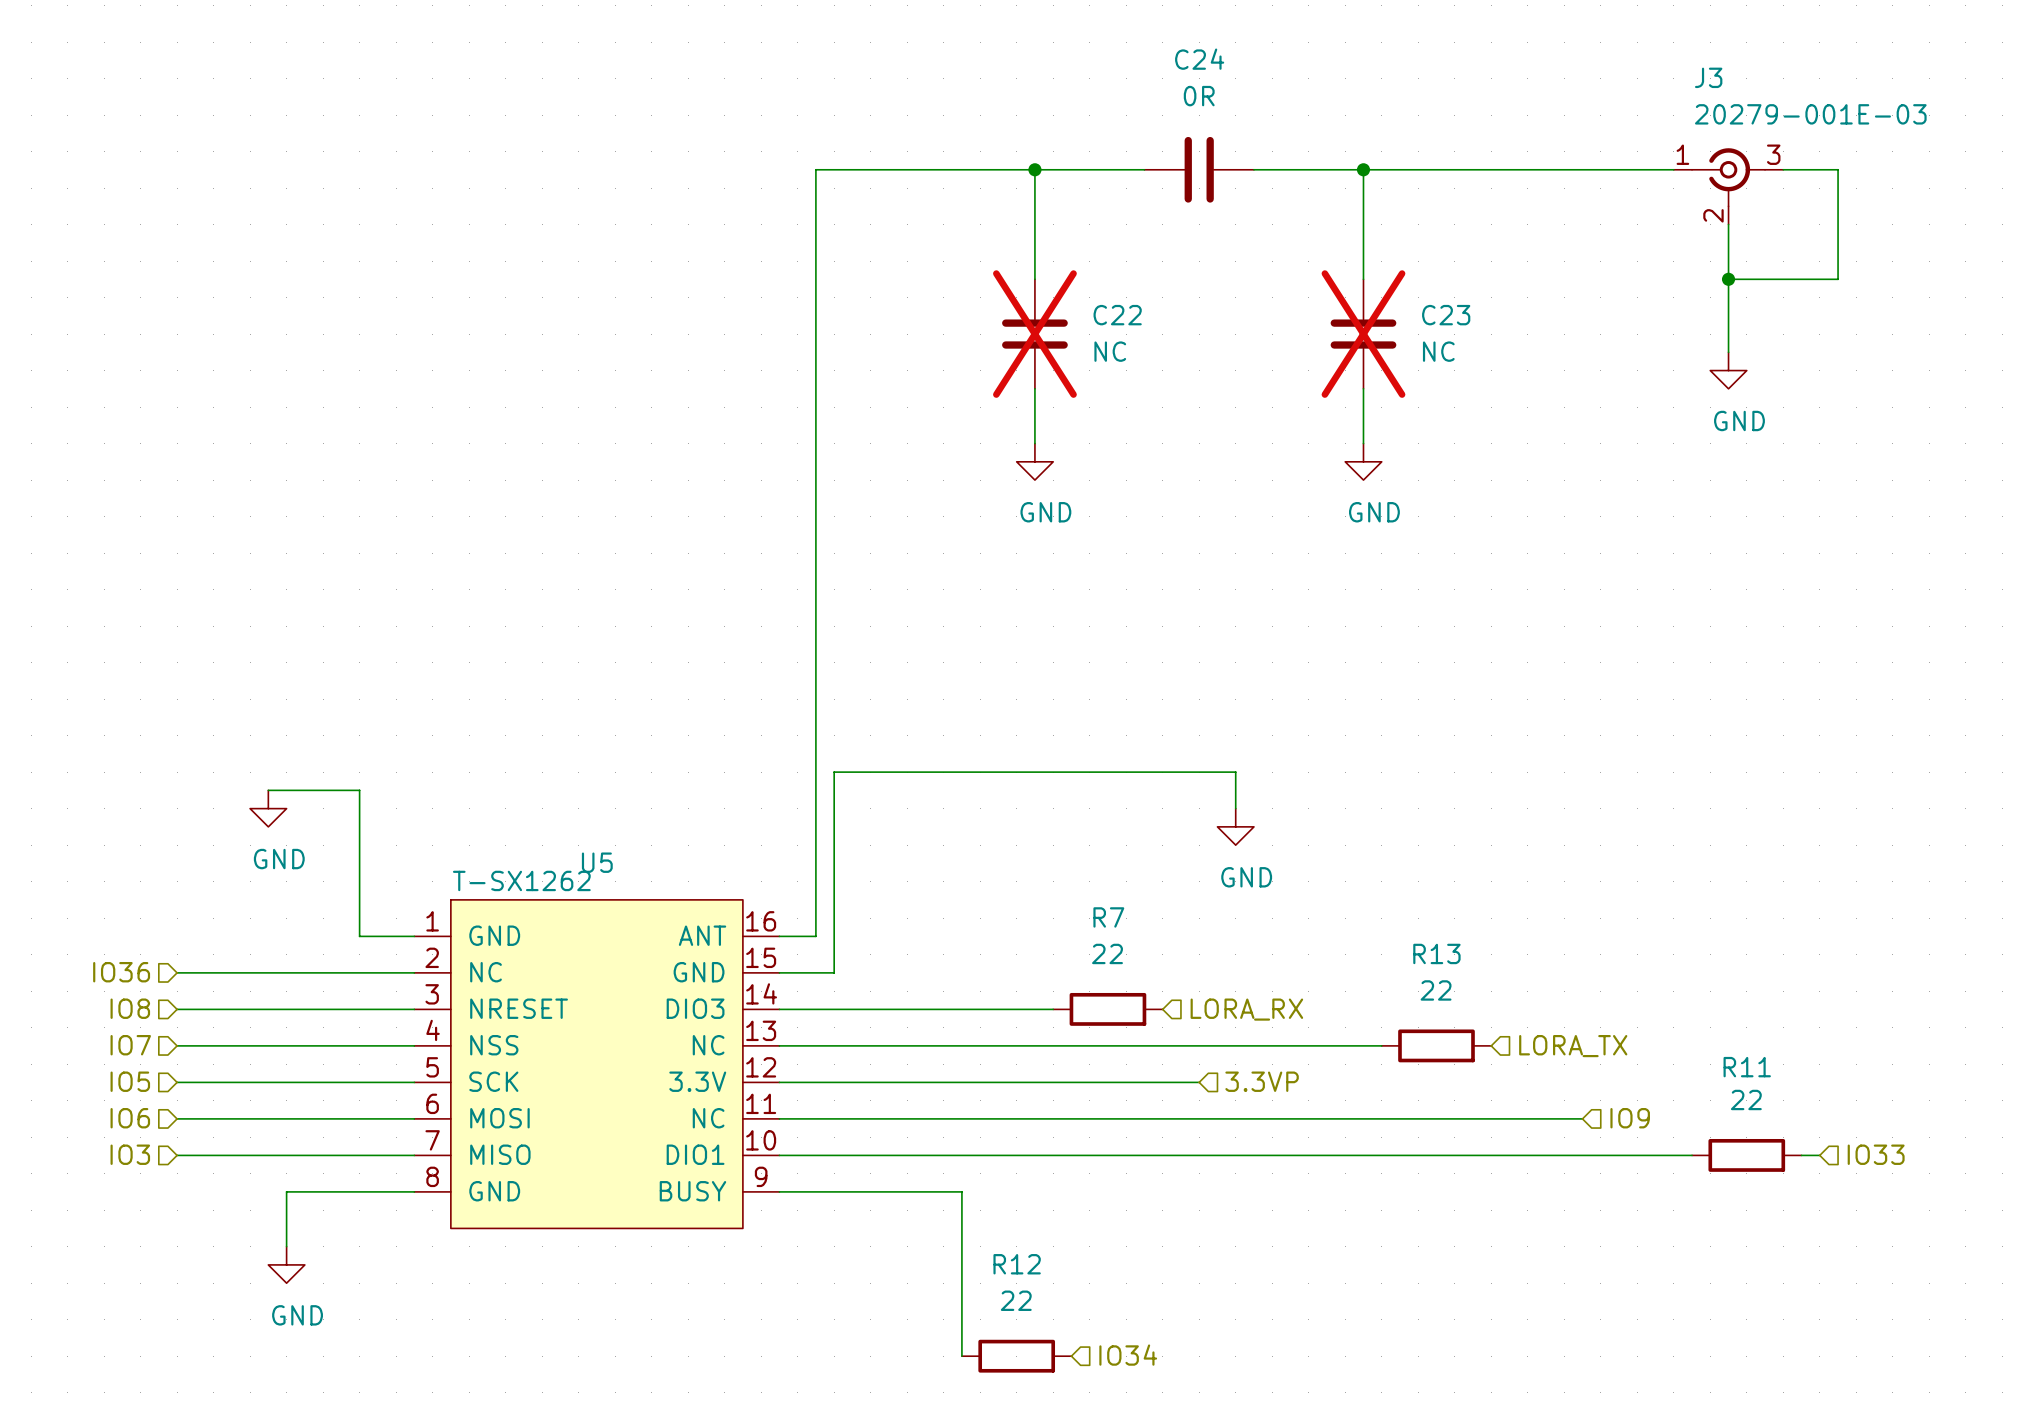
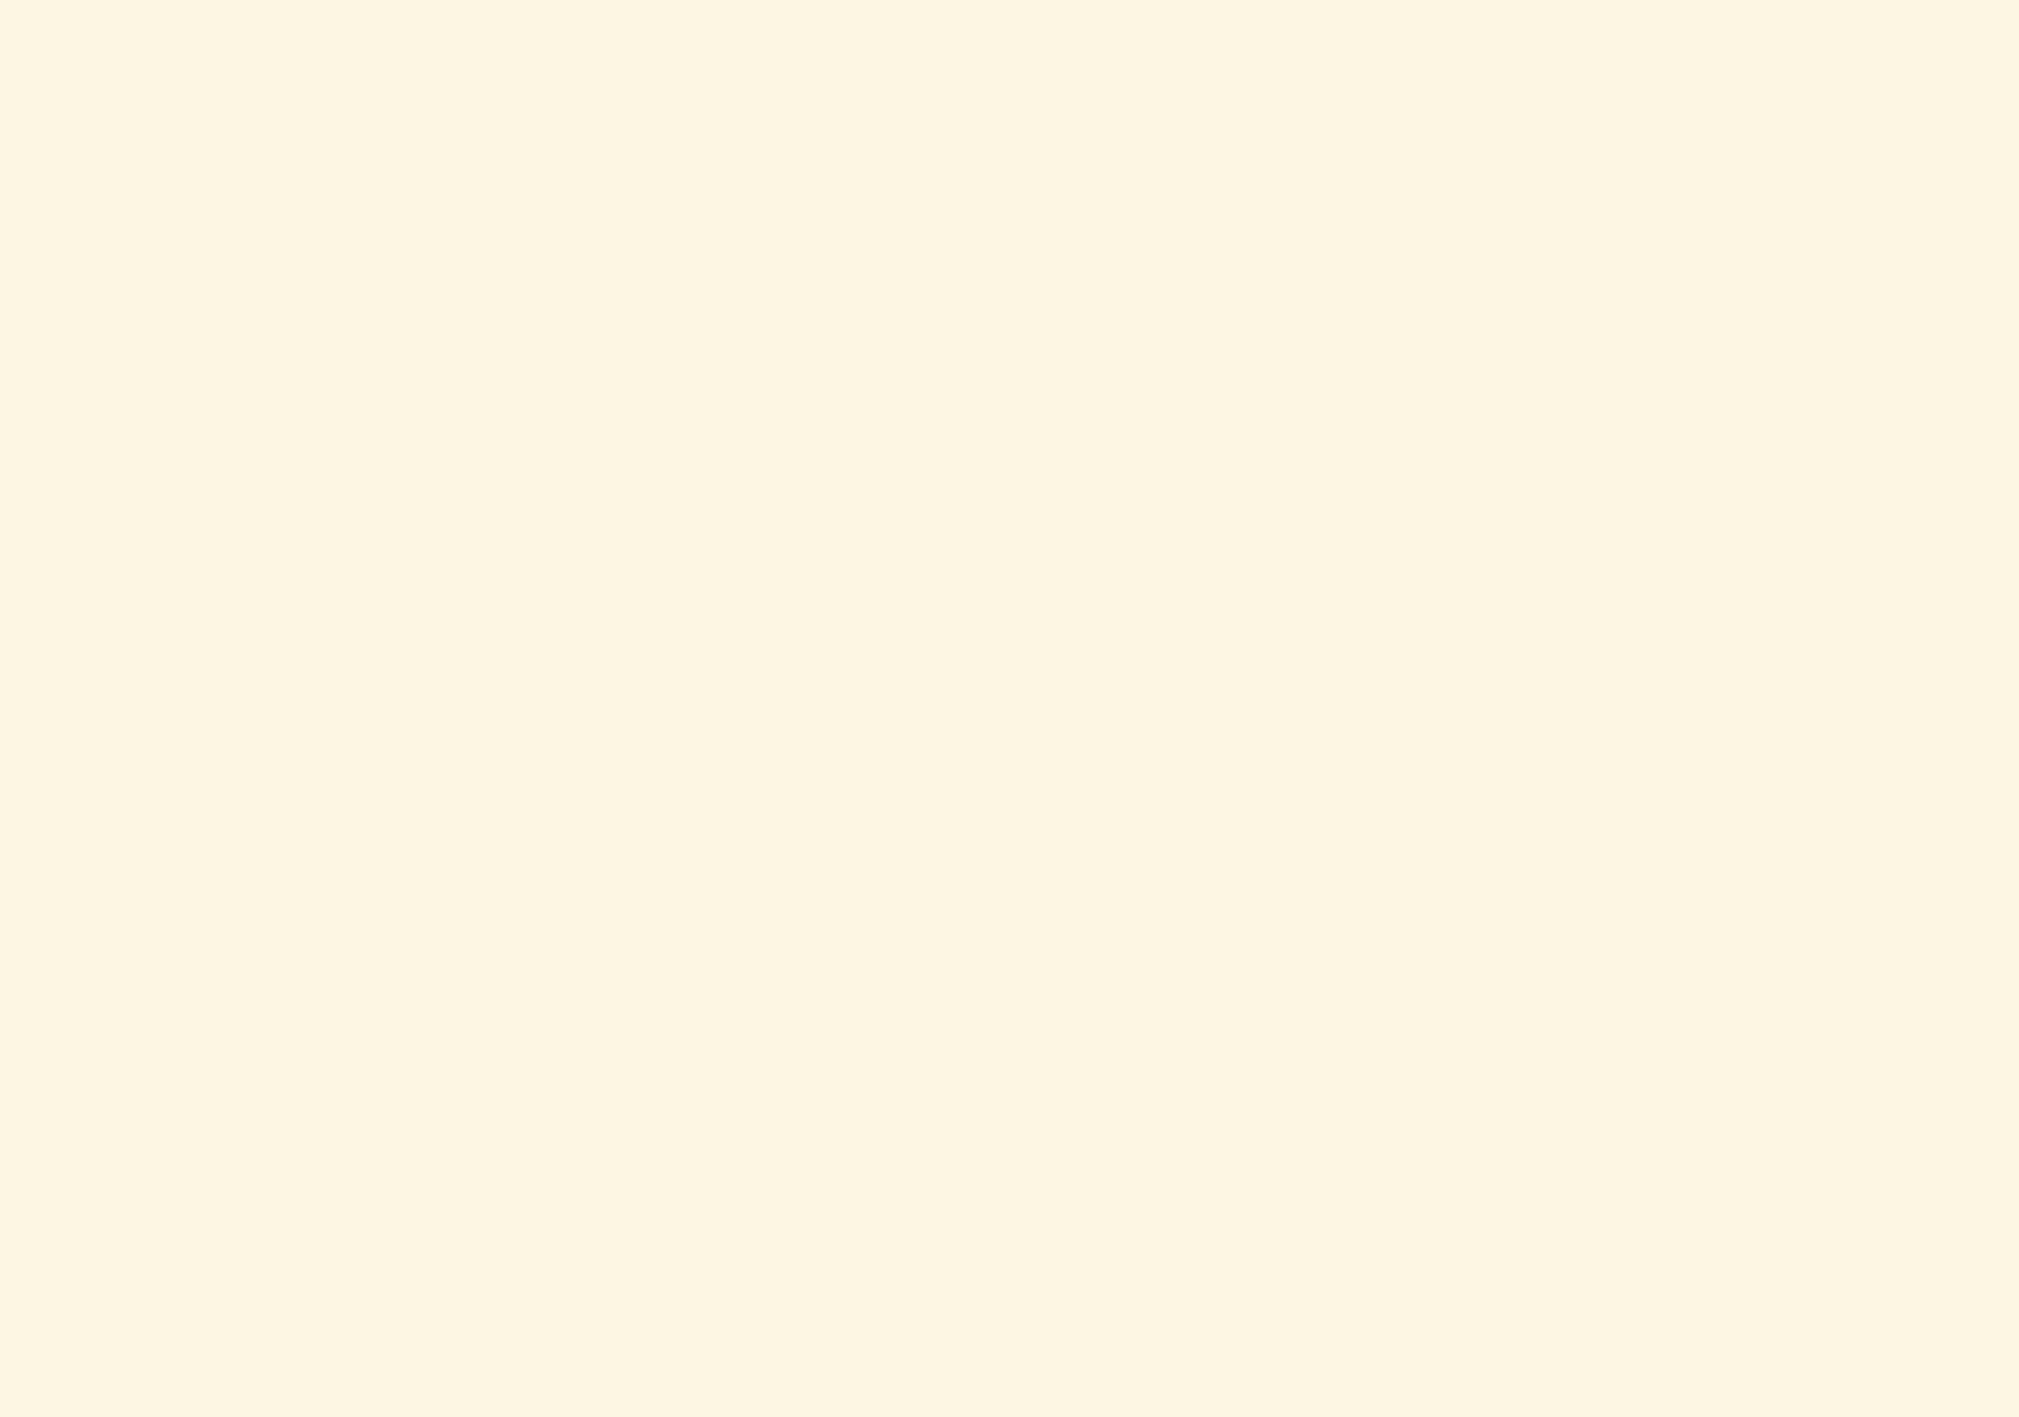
wire: (1034, 169) (1034, 279) -> none
junction: (1034, 169) -> none
wire: (1144, 169) (815, 169) (815, 936) (779, 936) -> none
C24: 0R (1199, 169) -> none
wire: (1253, 169) (1673, 169) -> none
wire: (1363, 169) (1363, 279) -> none
junction: (1363, 169) -> none
wire: (1783, 169) (1838, 169) (1838, 279) (1728, 279) -> none
J3: 20279-001E-03 (1728, 186) -> none
wire: (1728, 224) (1728, 352) -> none
junction: (1728, 279) -> none
C22: NC (1034, 334) -> none
C23: NC (1363, 334) -> none
power symbol: GND (1728, 370) -> none
wire: (1034, 388) (1034, 443) -> none
wire: (1363, 388) (1363, 443) -> none
power symbol: GND (1034, 461) -> none
power symbol: GND (1363, 461) -> none
wire: (268, 790) (359, 790) (359, 936) (414, 936) -> none
power symbol: GND (268, 808) -> none
wire: (1235, 808) (1235, 772) (834, 772) (834, 972) (779, 972) -> none
power symbol: GND (1235, 826) -> none
hierarchical label: IO36 (121, 972) -> none
wire: (177, 972) (414, 972) -> none
hierarchical label: IO8 (130, 1008) -> none
wire: (177, 1009) (414, 1009) -> none
wire: (779, 1009) (1053, 1009) -> none
R7: 22 (1107, 1009) -> none
hierarchical label: LORA_RX (1246, 1009) -> none
hierarchical label: IO7 (130, 1045) -> none
wire: (177, 1045) (414, 1045) -> none
wire: (779, 1045) (1381, 1045) -> none
R13: 22 (1436, 1045) -> none
hierarchical label: LORA_TX (1573, 1046) -> none
U5: T-SX1262 (596, 1064) -> none
hierarchical label: IO5 (130, 1081) -> none
hierarchical label: 3.3VP (1262, 1081) -> none
wire: (177, 1082) (414, 1082) -> none
wire: (779, 1082) (1199, 1082) -> none
hierarchical label: IO6 (130, 1118) -> none
wire: (177, 1118) (414, 1118) -> none
wire: (779, 1118) (1582, 1118) -> none
hierarchical label: IO9 (1630, 1118) -> none
hierarchical label: IO3 (130, 1154) -> none
hierarchical label: IO33 (1876, 1154) -> none
wire: (177, 1155) (414, 1155) -> none
wire: (779, 1155) (1692, 1155) -> none
R11: 22 (1746, 1155) -> none
wire: (1801, 1155) (1819, 1155) -> none
wire: (414, 1191) (286, 1191) (286, 1246) -> none
wire: (779, 1191) (961, 1191) (961, 1356) -> none
power symbol: GND (286, 1264) -> none
hierarchical label: IO34 (1128, 1355) -> none
R12: 22 (1016, 1356) -> none

